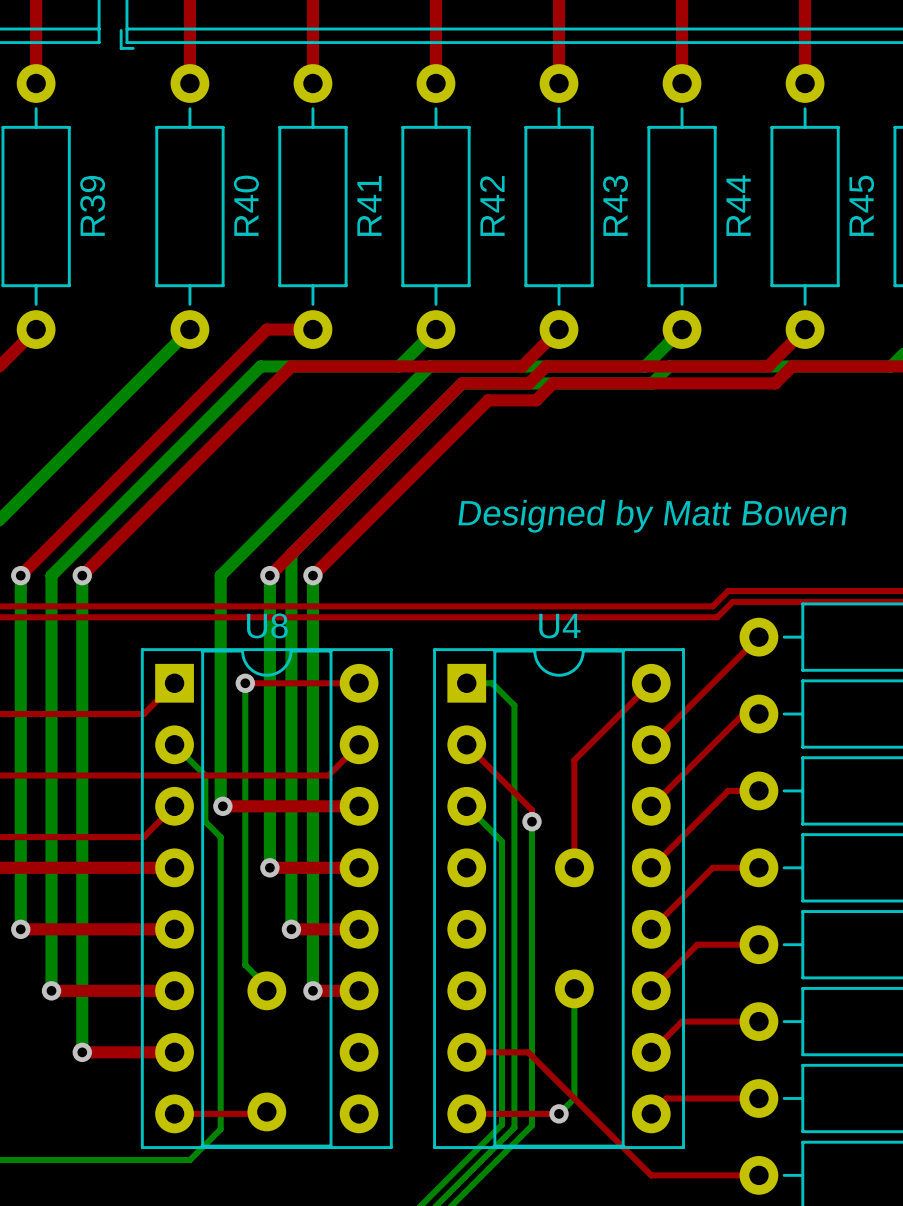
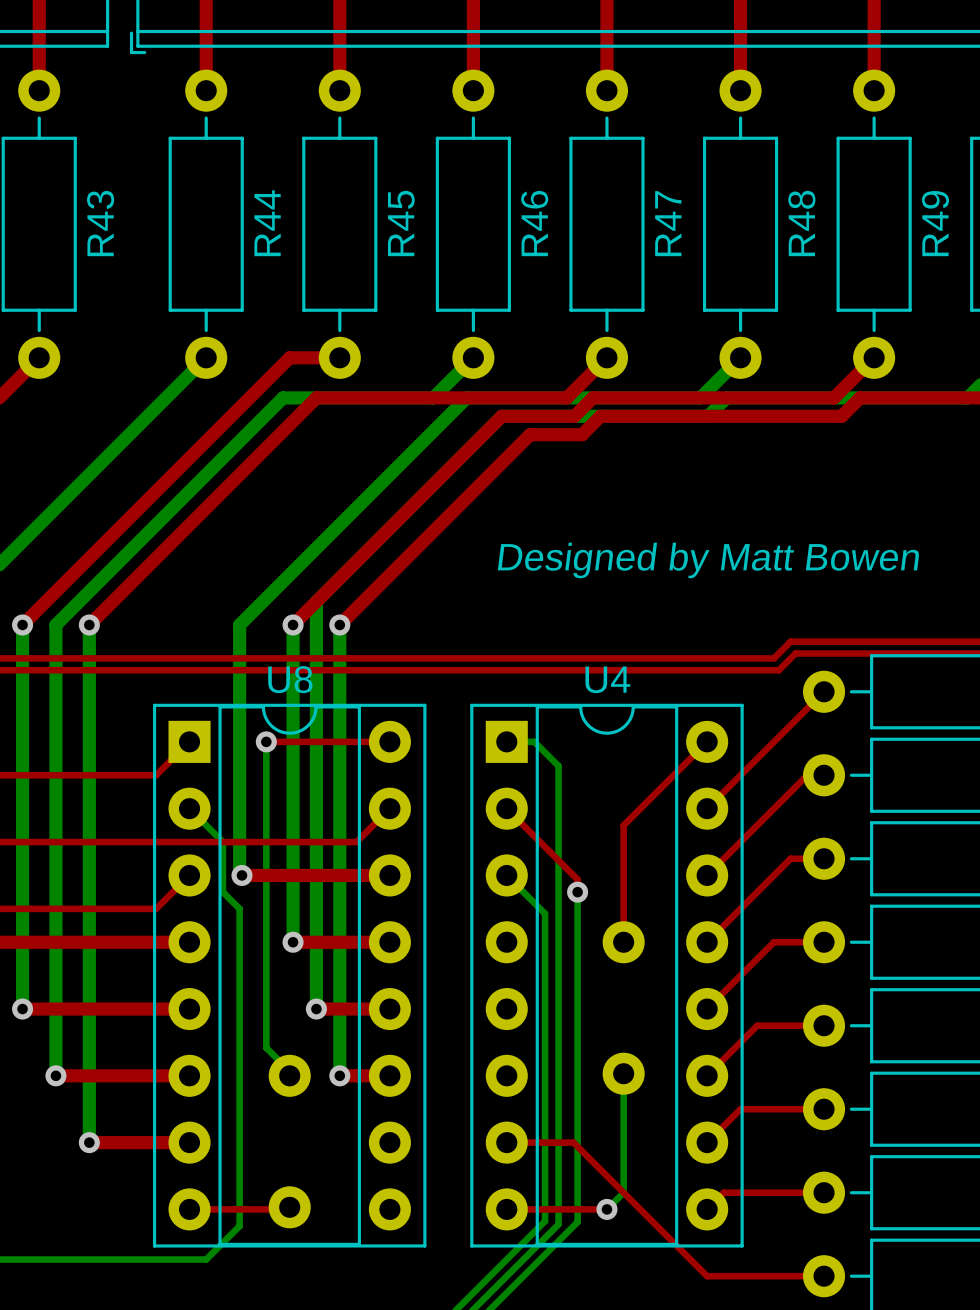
R39 name: R39 (92, 205) -> R43 (100, 223)
R40 name: R40 (246, 205) -> R44 (267, 223)
R41 name: R41 (369, 205) -> R45 (401, 223)
R42 name: R42 (492, 205) -> R46 (534, 223)
R43 name: R43 (615, 205) -> R47 (668, 223)
R44 name: R44 (738, 205) -> R48 (801, 223)
R45 name: R45 (861, 205) -> R49 (935, 223)

